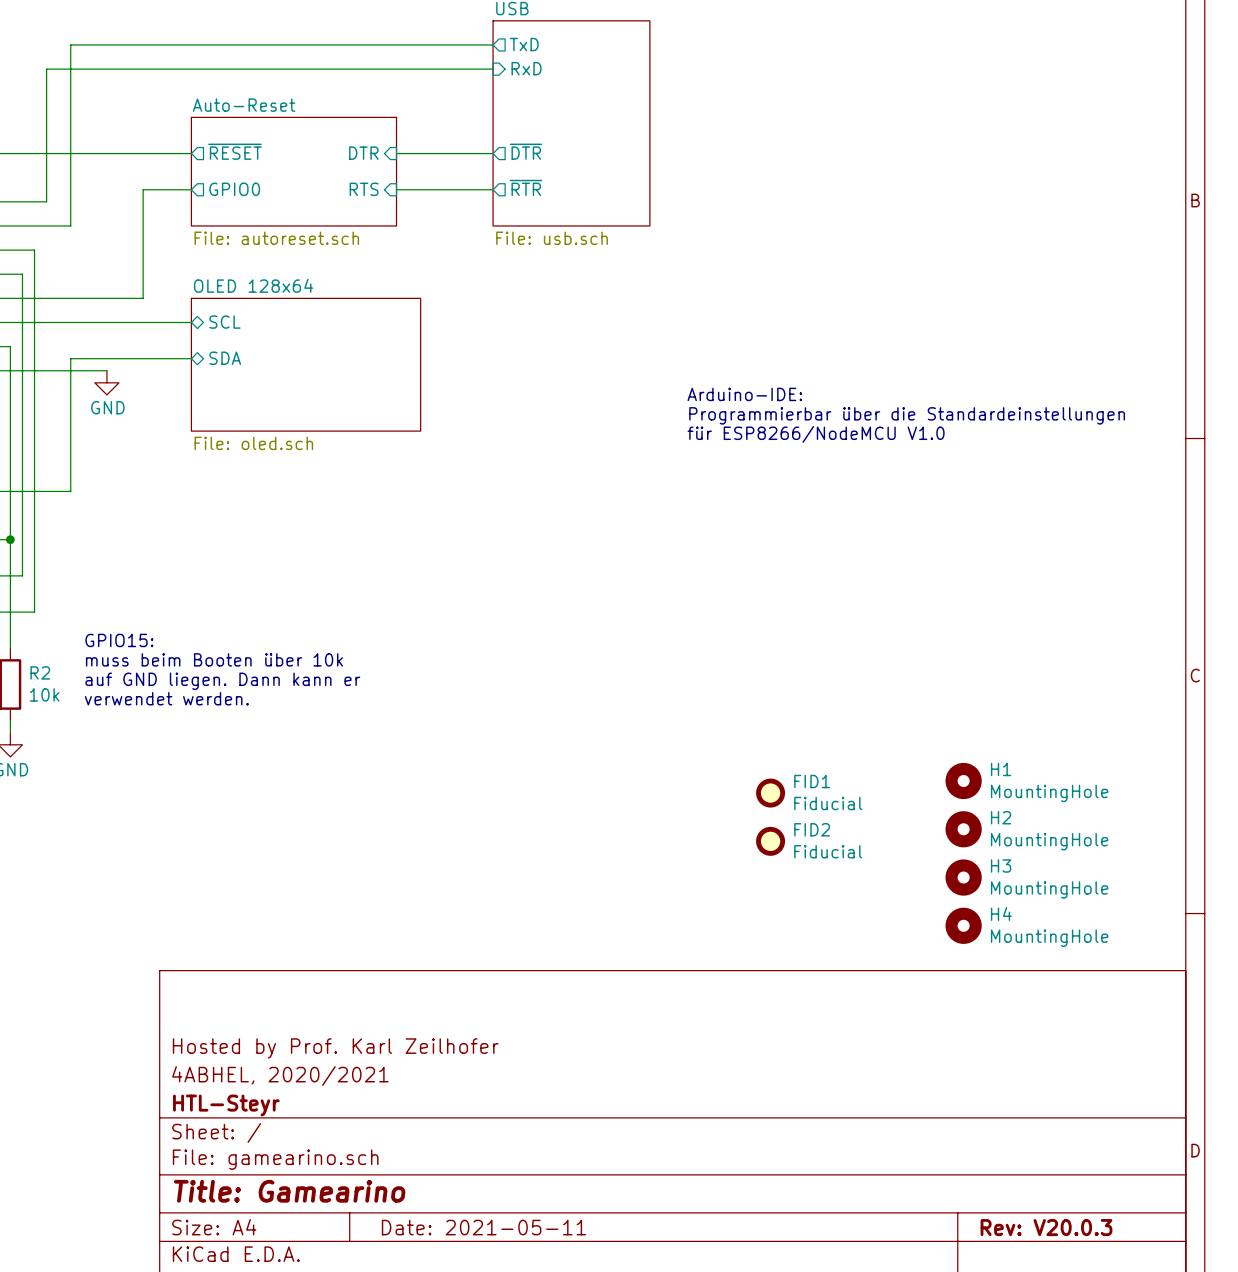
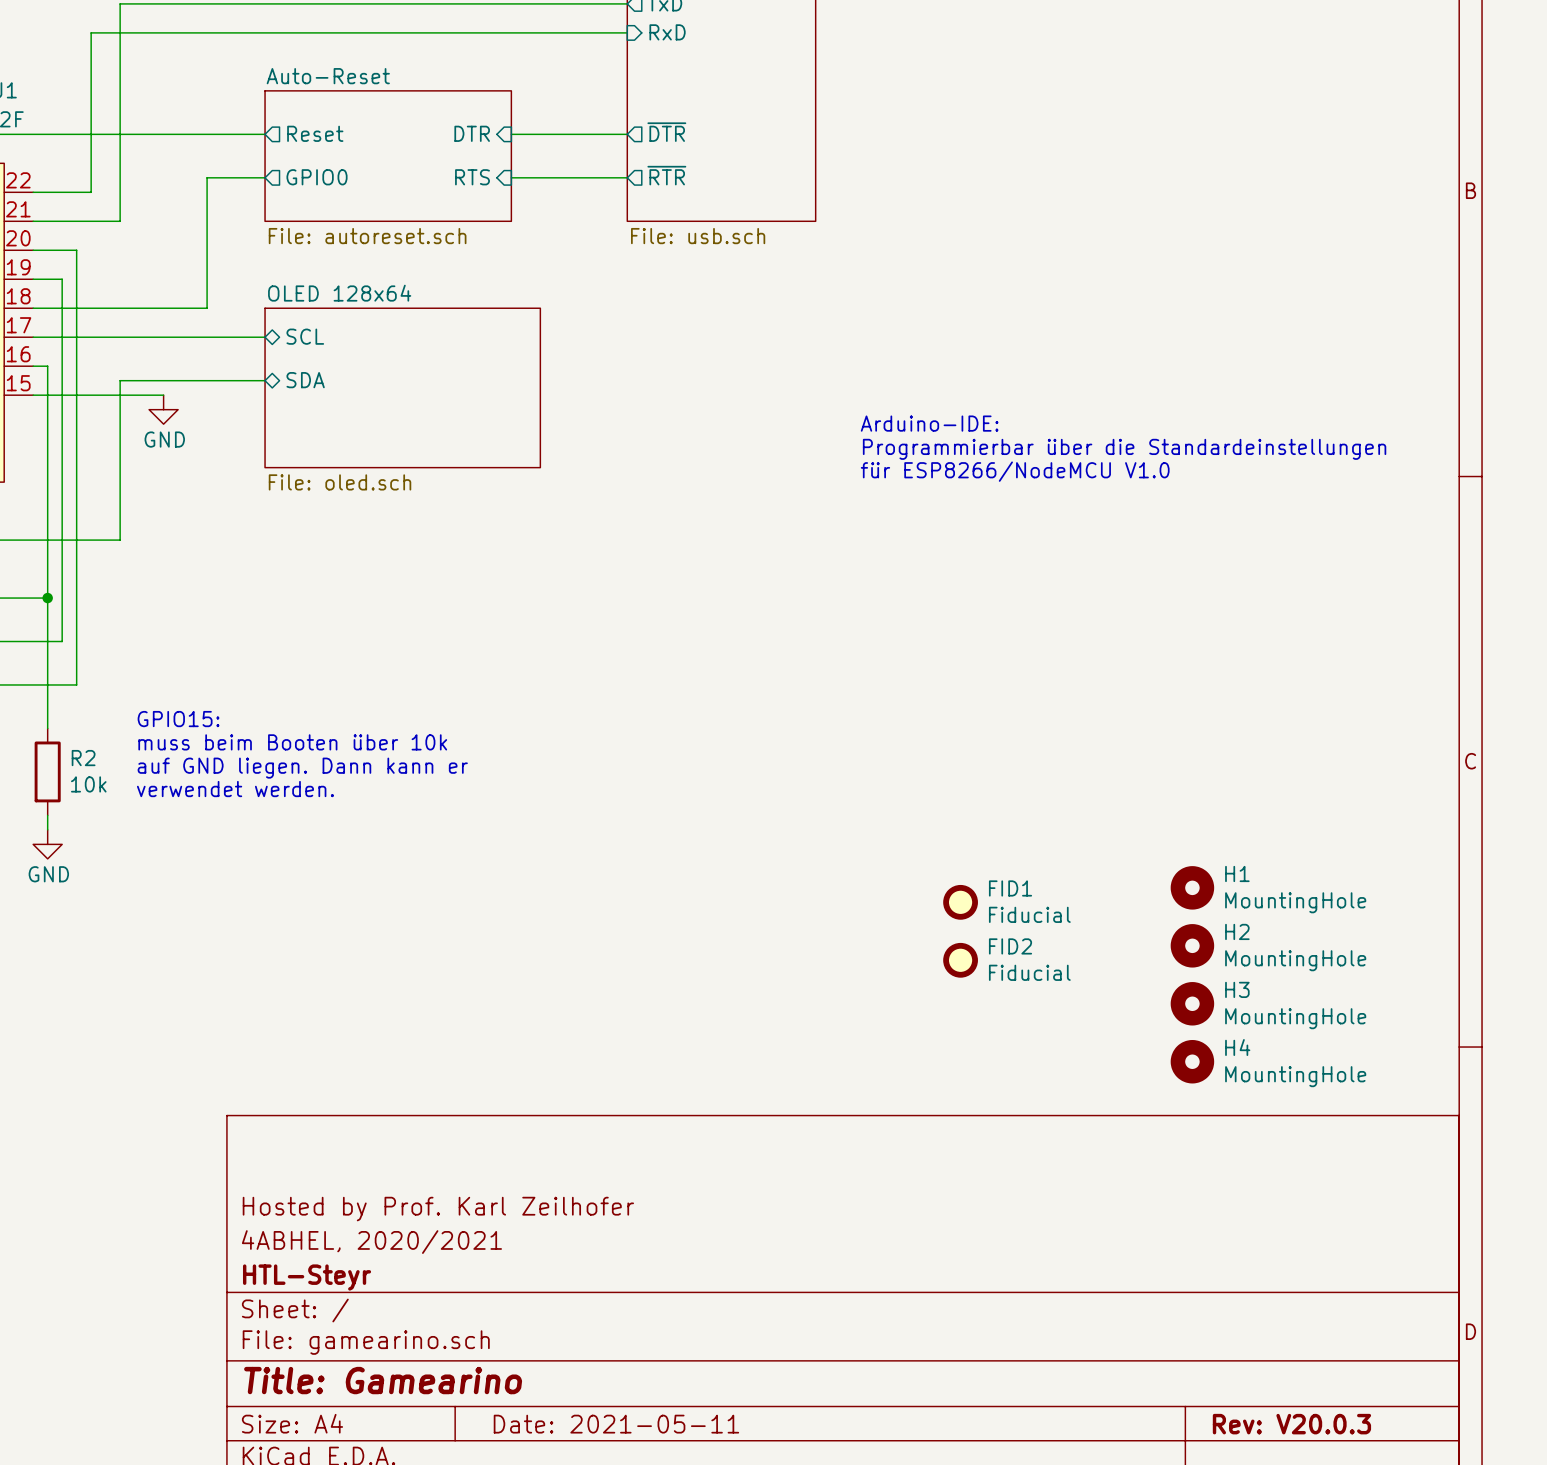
sheet pin: ~{RESET} (234, 151) -> Reset (315, 133)

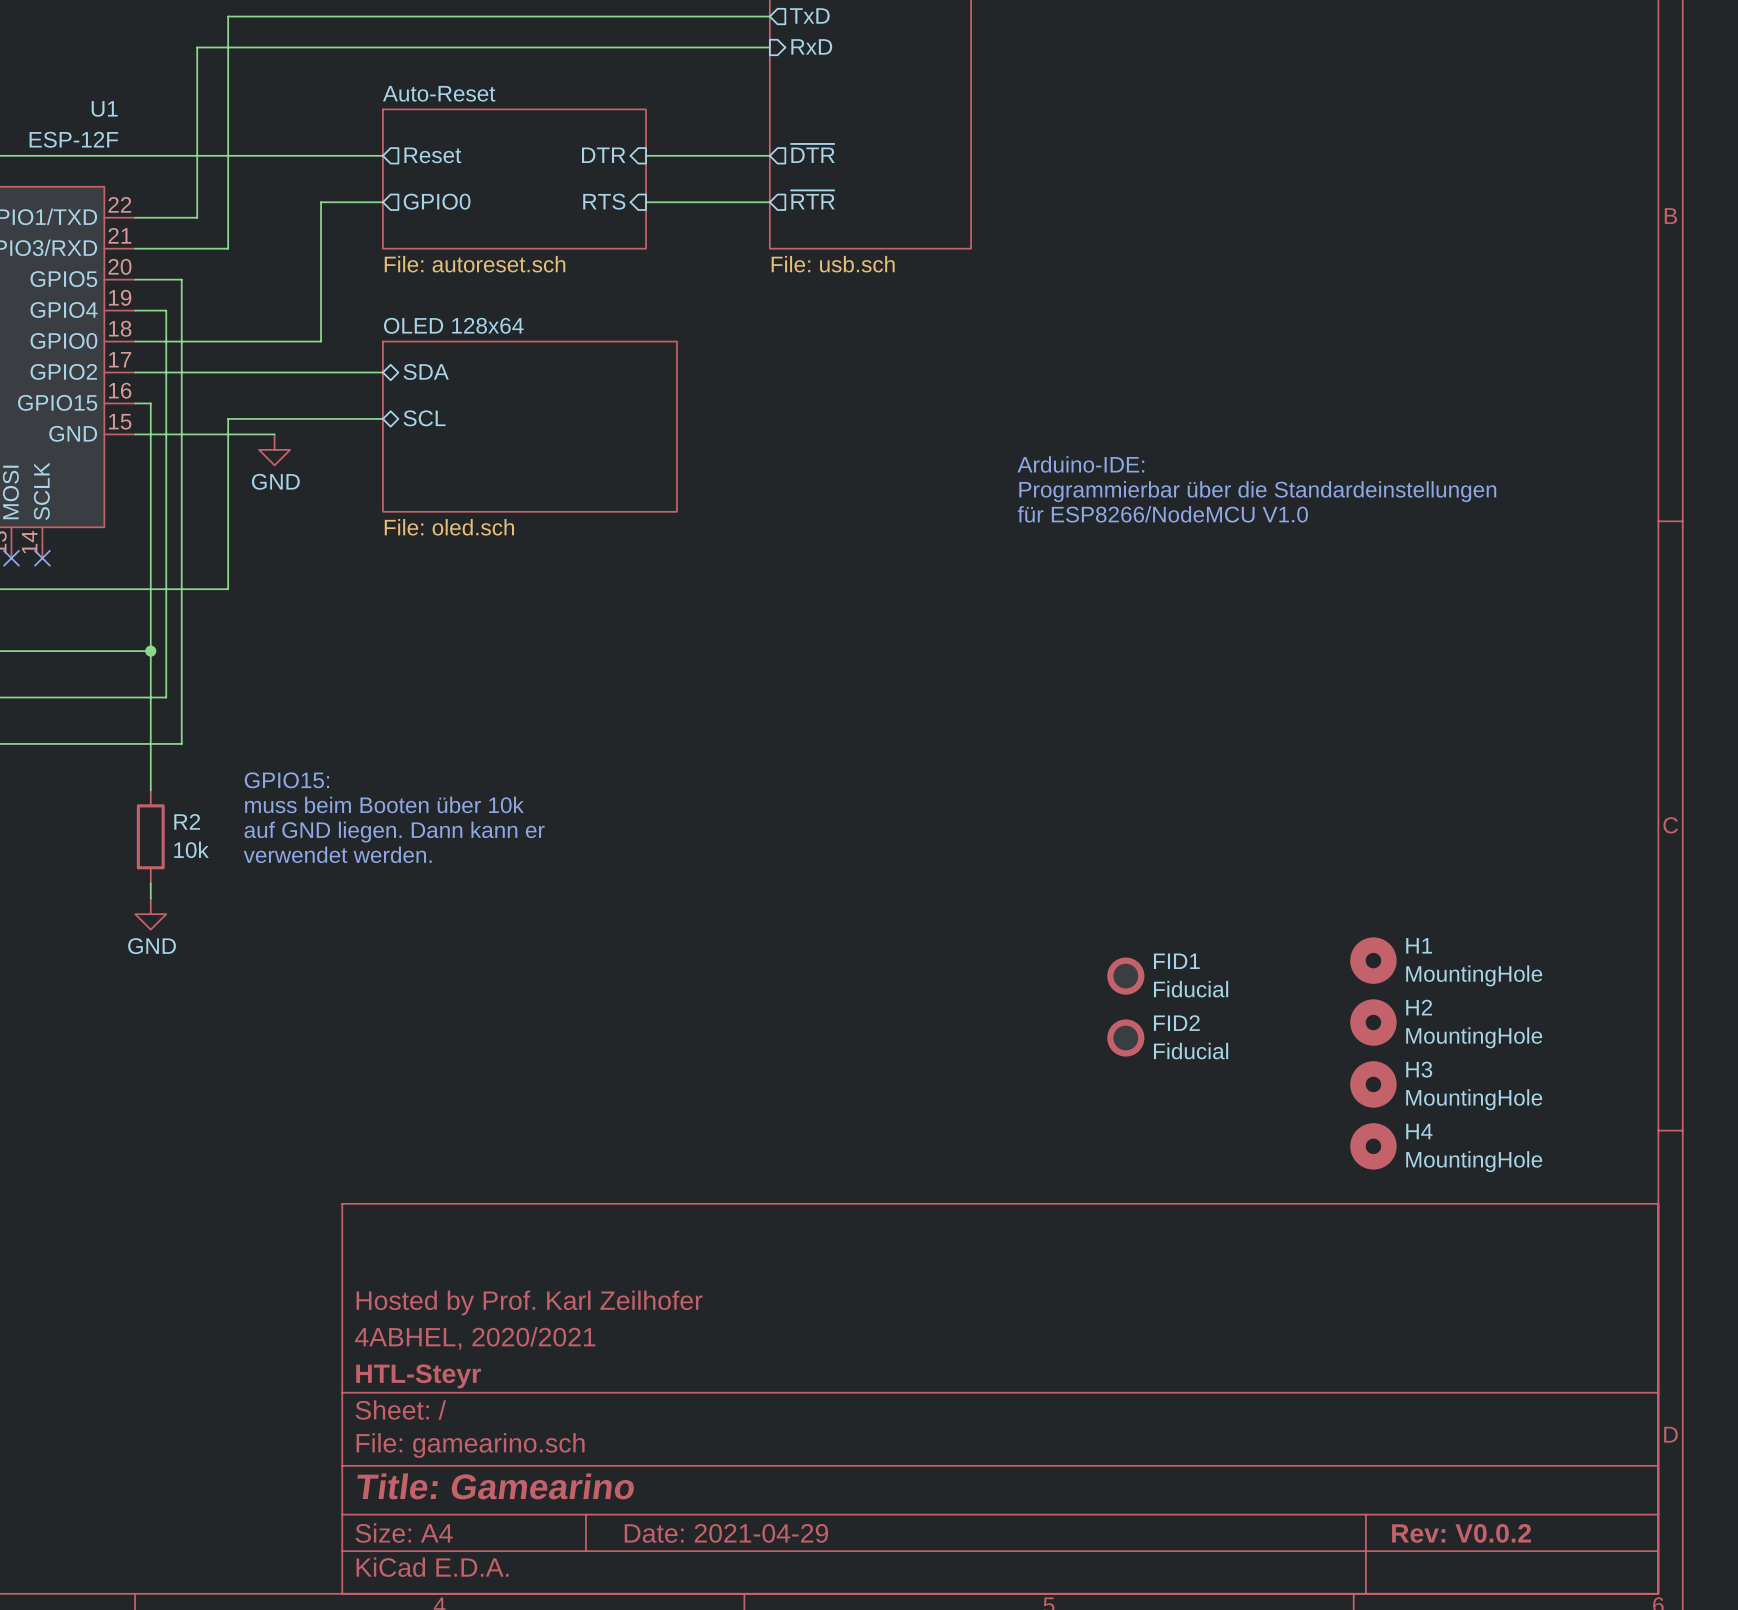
sheet pin: SCL (305, 336) -> SDA (426, 371)
sheet pin: SDA (305, 380) -> SCL (424, 418)
title block: Date: 2021-05-11 (616, 1424) -> Date: 2021-04-29 (726, 1533)
title block: Rev: V20.0.3 (1291, 1424) -> Rev: V0.0.2 (1461, 1533)

